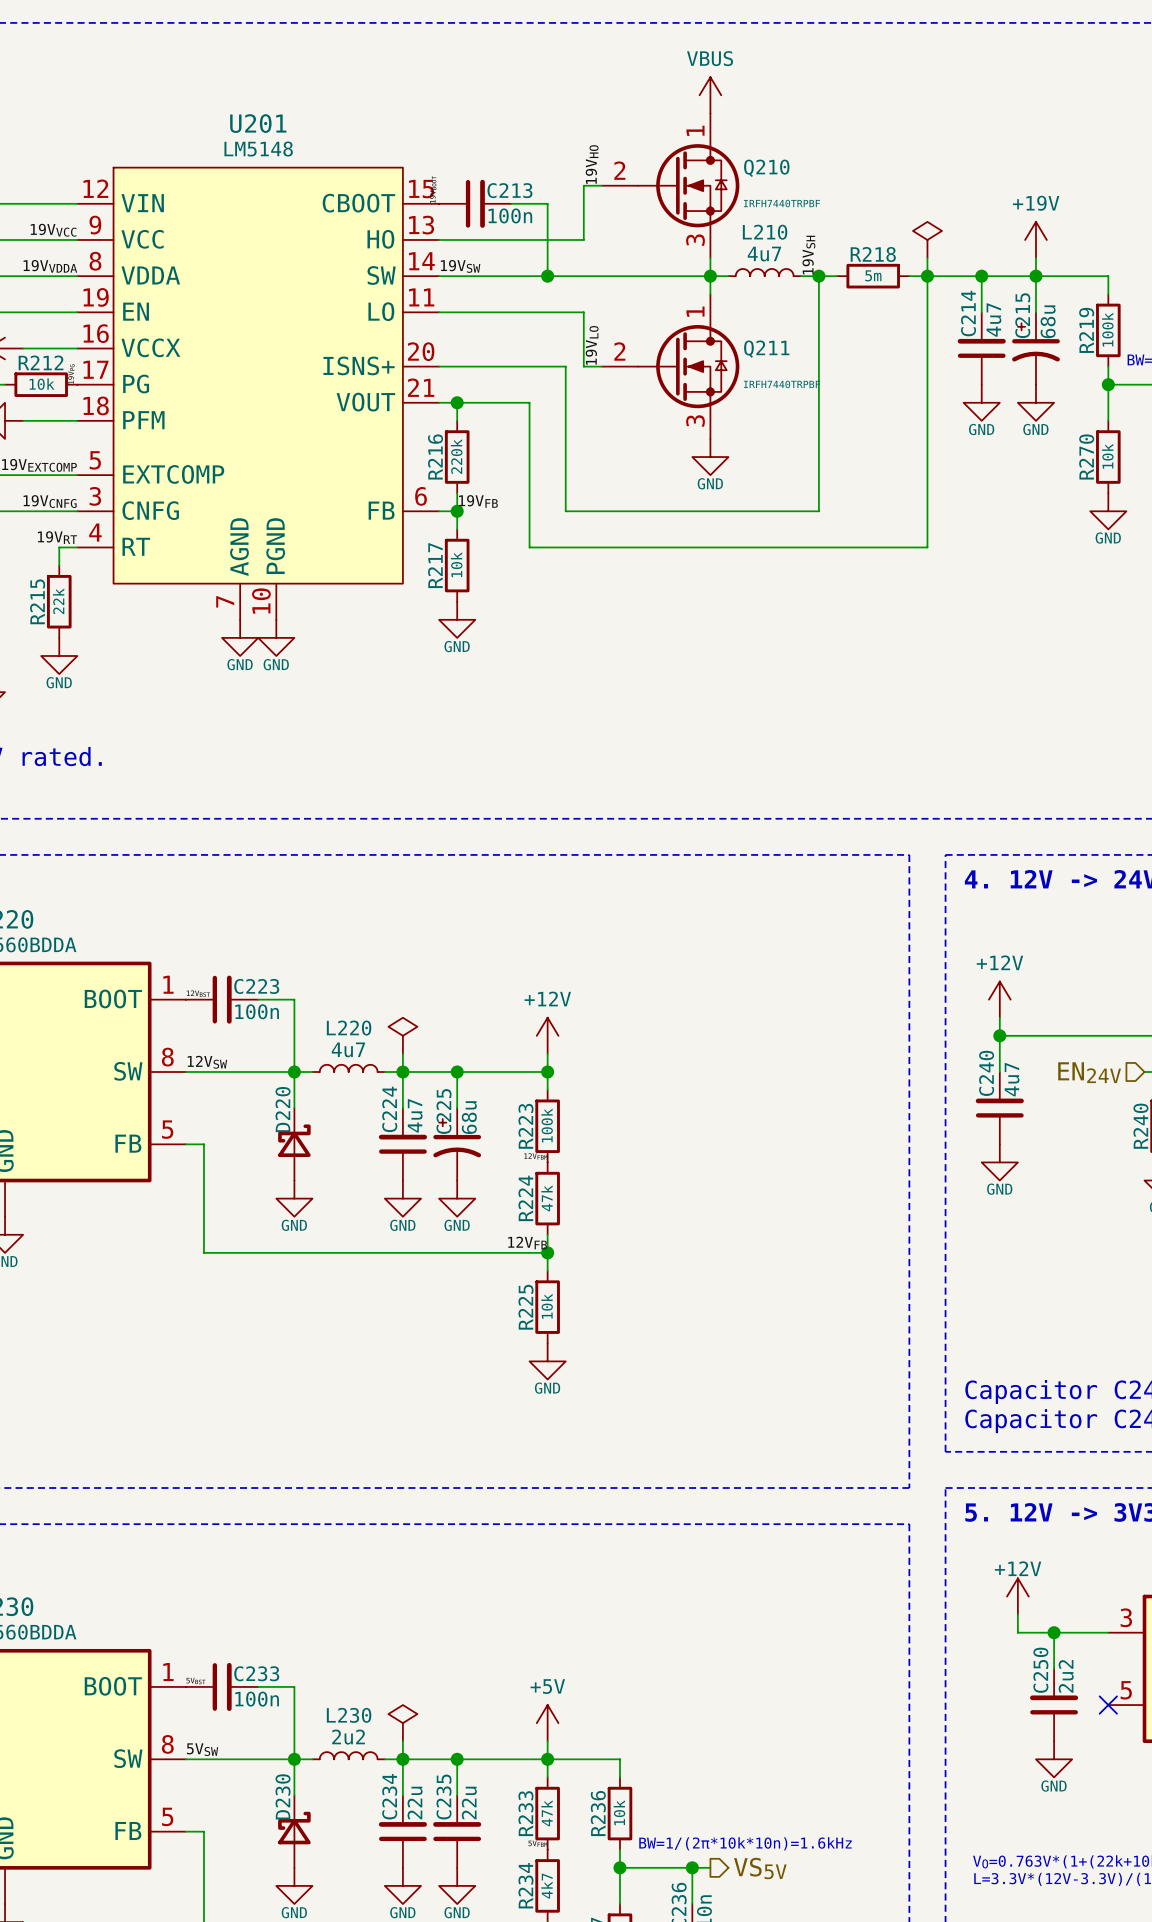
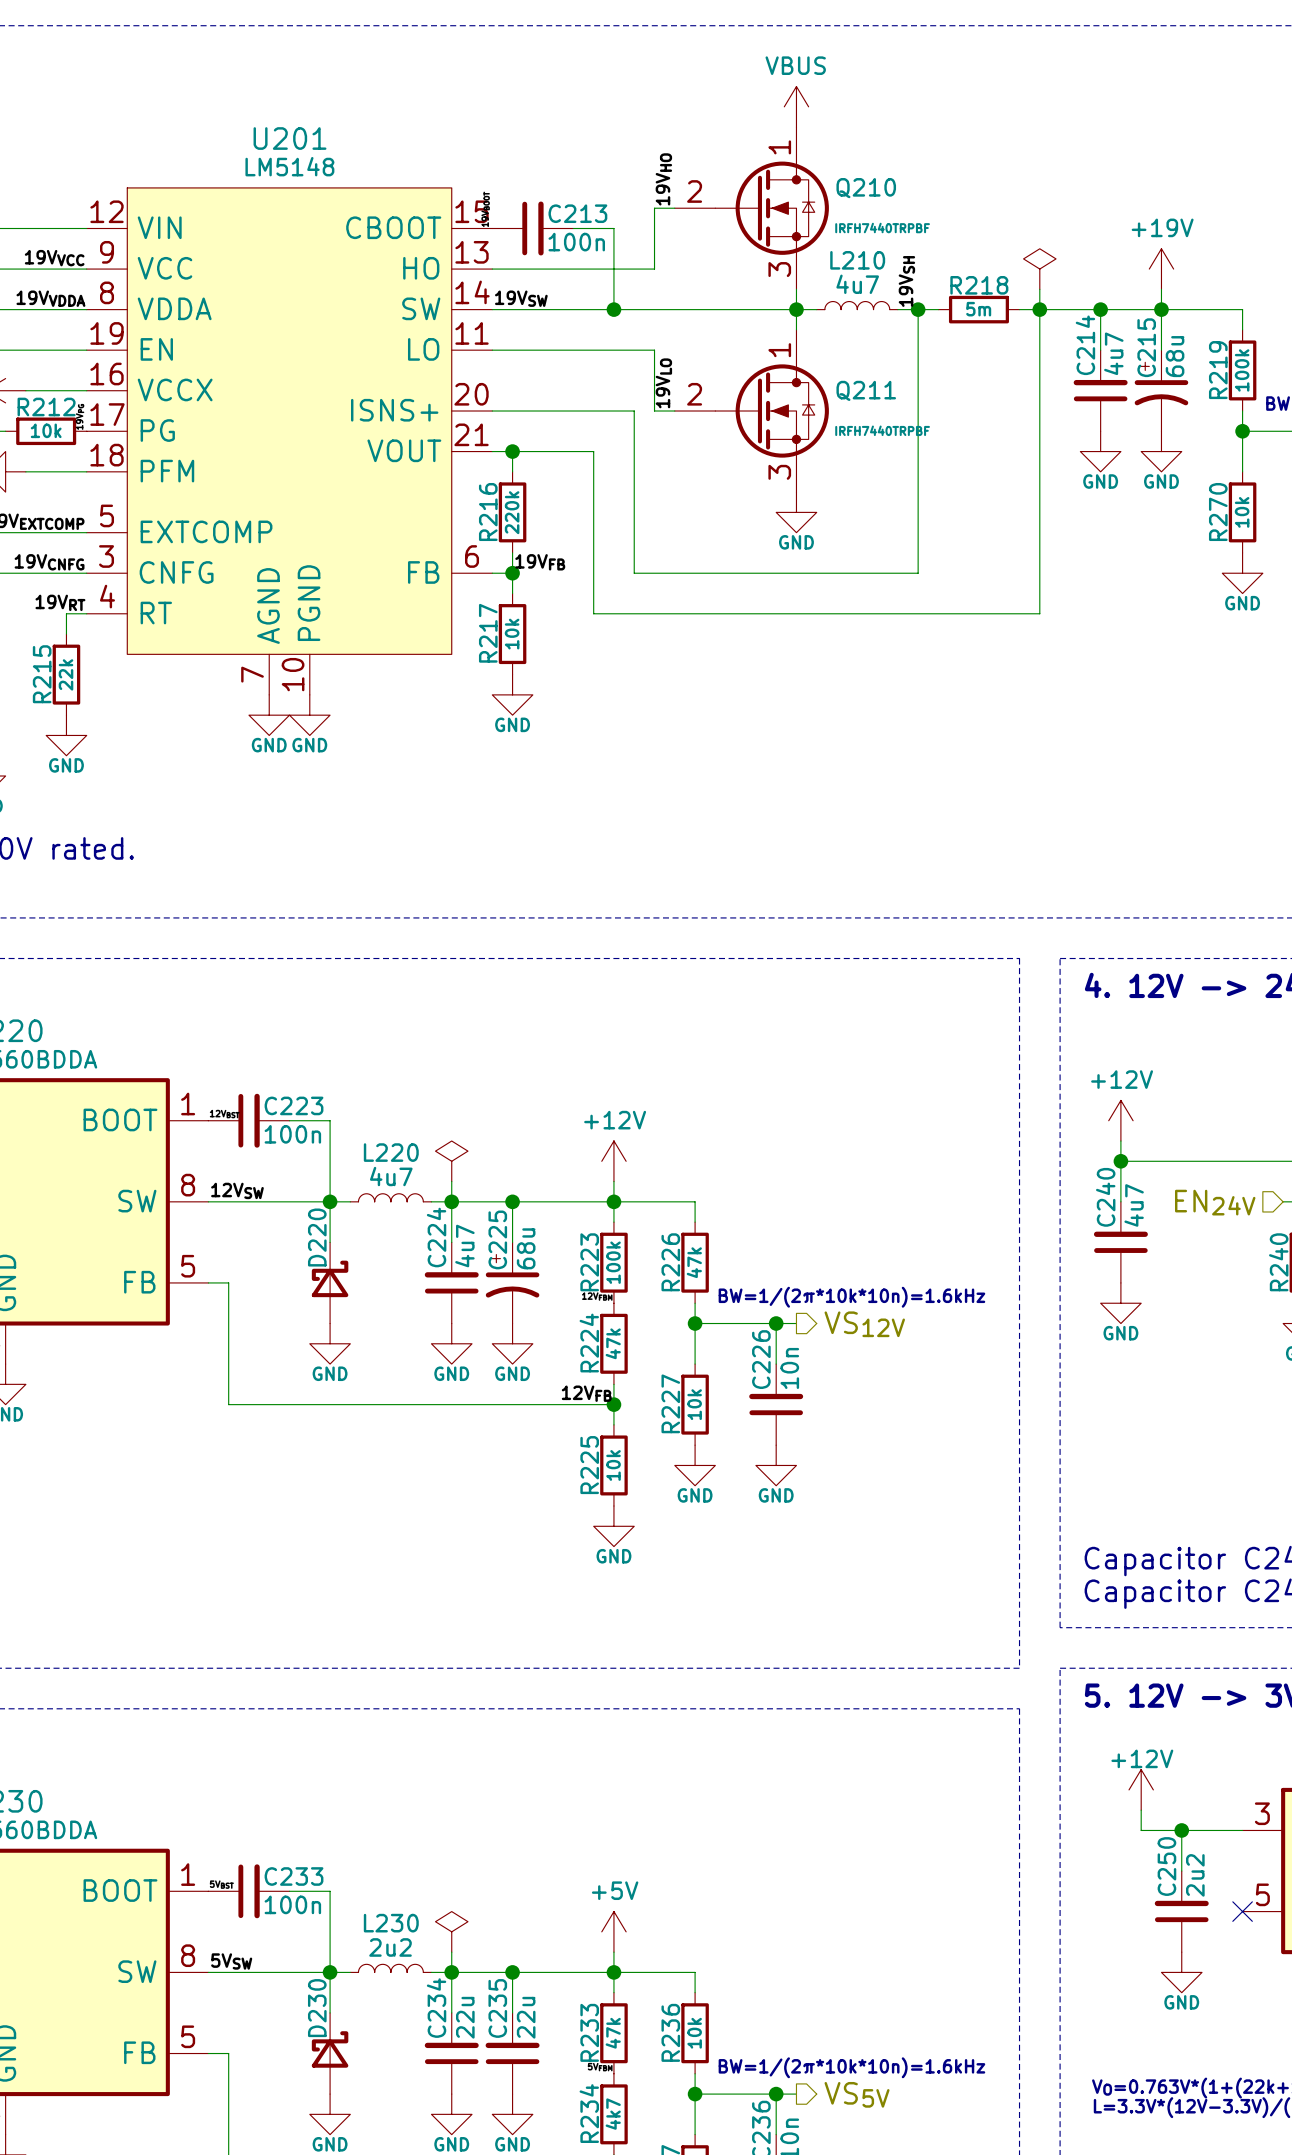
wire: none -> (613, 1201) (695, 1201) (695, 1222)
R226: none -> 47k (695, 1262)
text: none -> BW=1/(2π*10k*10n)=1.6kHz (851, 1297)
wire: none -> (695, 1303) (695, 1364)
wire: none -> (695, 1323) (796, 1323)
junction: none -> (695, 1323)
wire: none -> (776, 1323) (776, 1364)
junction: none -> (776, 1323)
hierarchical label: none -> VS12V (864, 1324)
R227: none -> 10k (695, 1404)
C226: none -> 10n (776, 1404)
power symbol: none -> GND (695, 1465)
power symbol: none -> GND (776, 1465)

